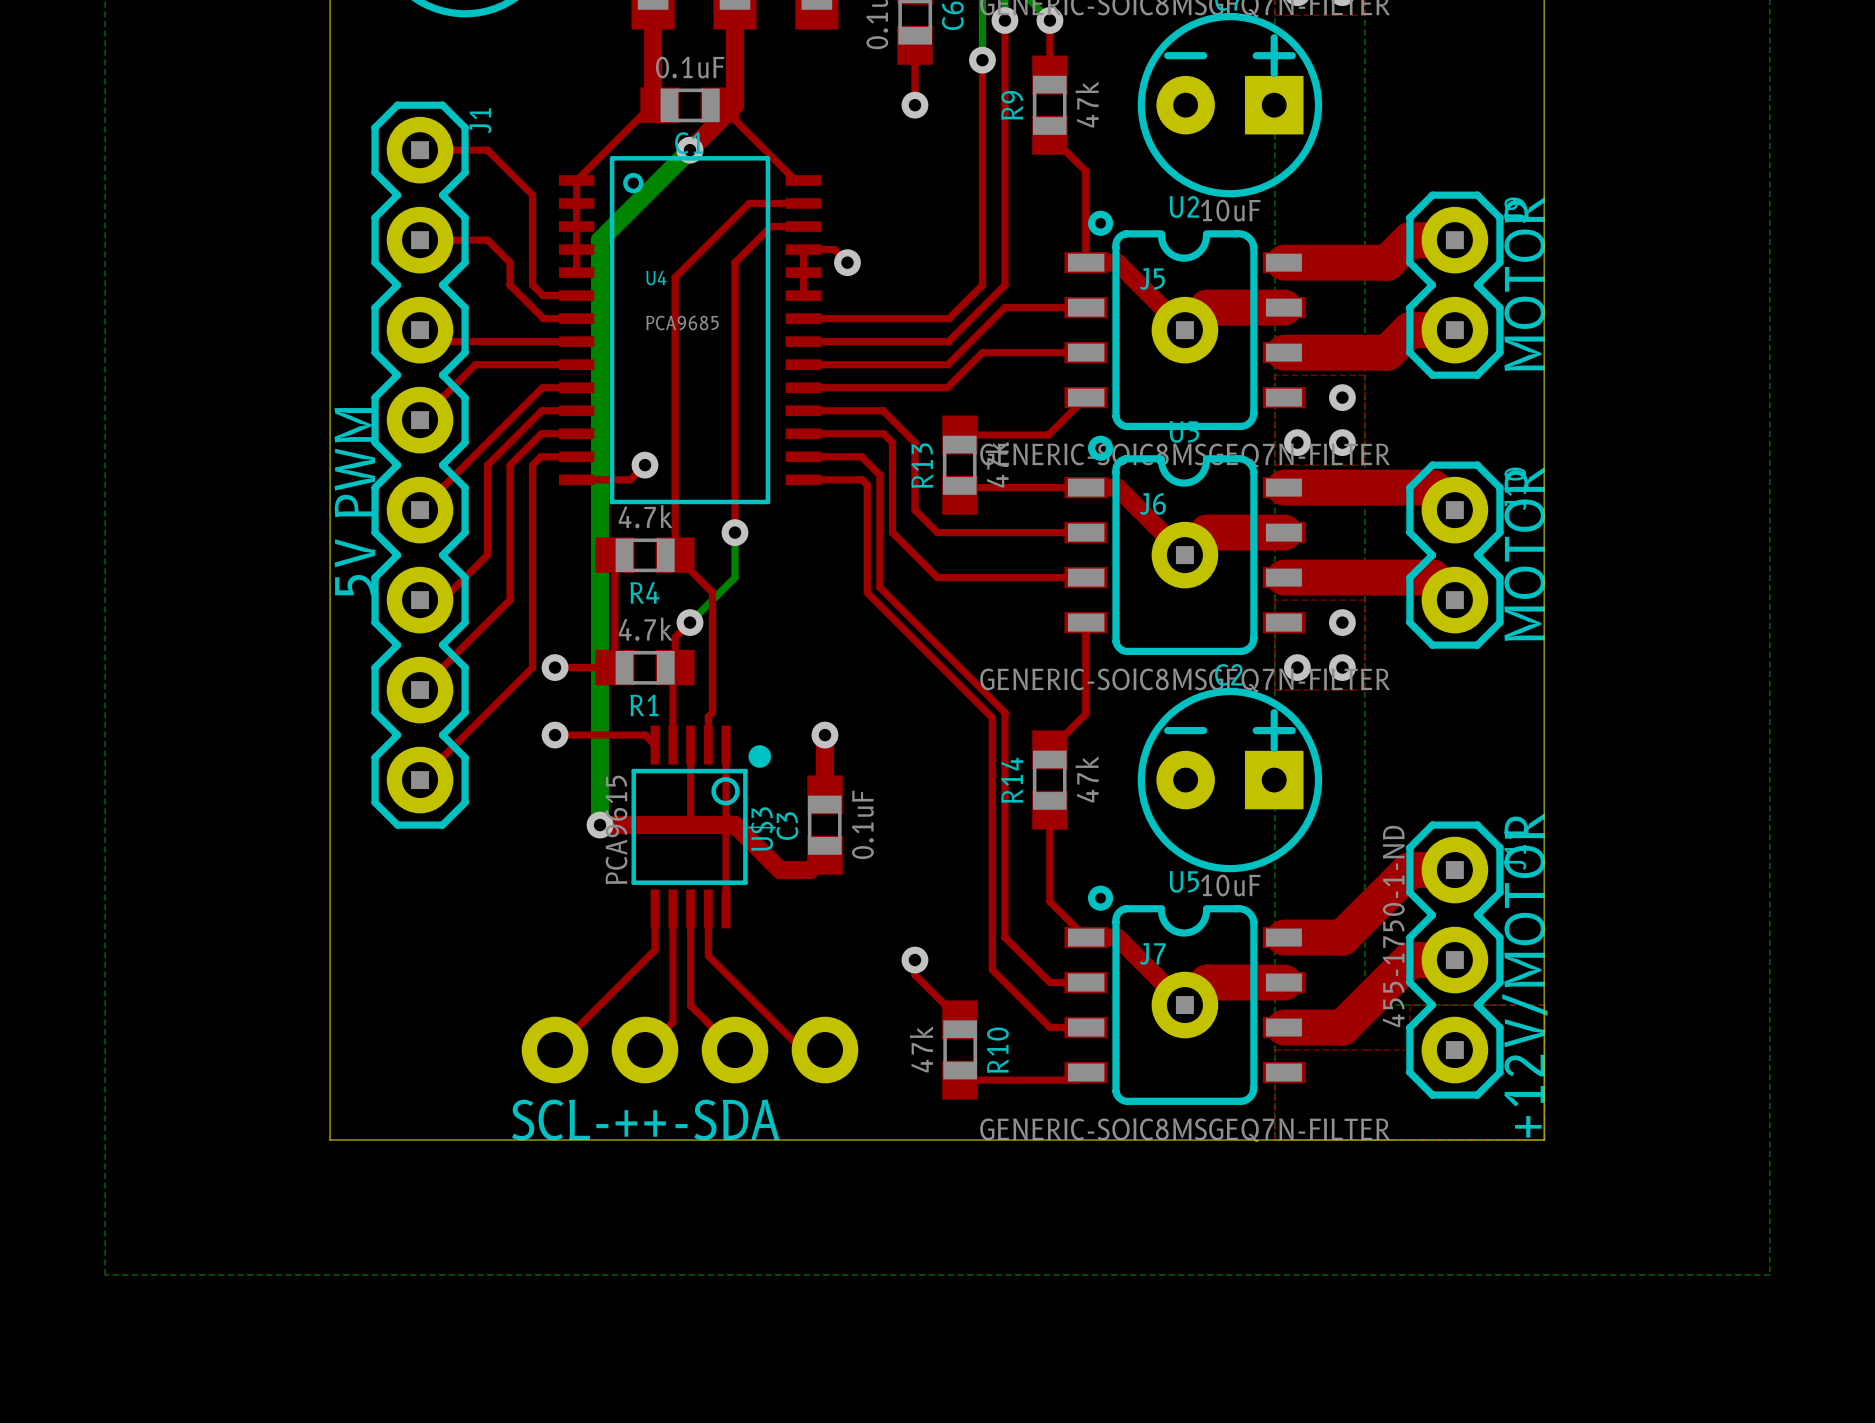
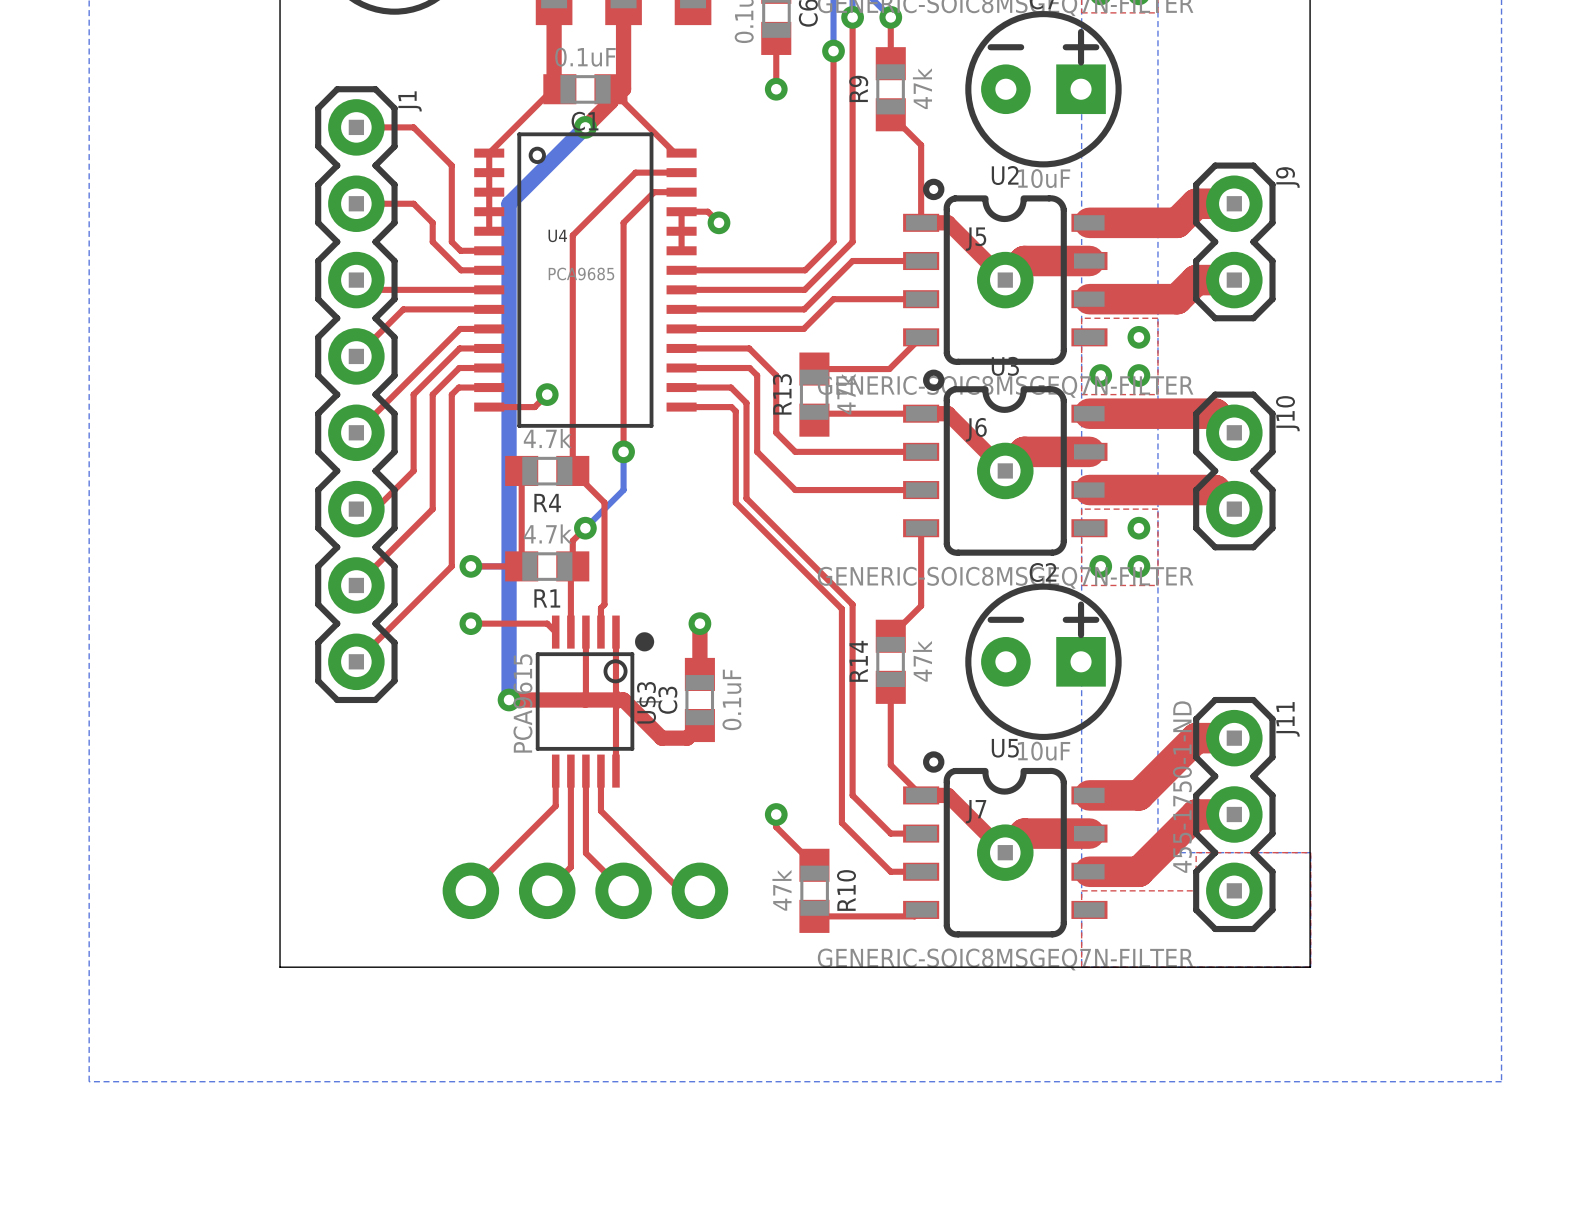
text: MOTOR (1524, 283) -> none
text: 5V PWM (355, 501) -> none
text: MOTOR (1524, 553) -> none
text: +12V/MOTOR (1524, 975) -> none
text: SCL-++-SDA (645, 1119) -> none

